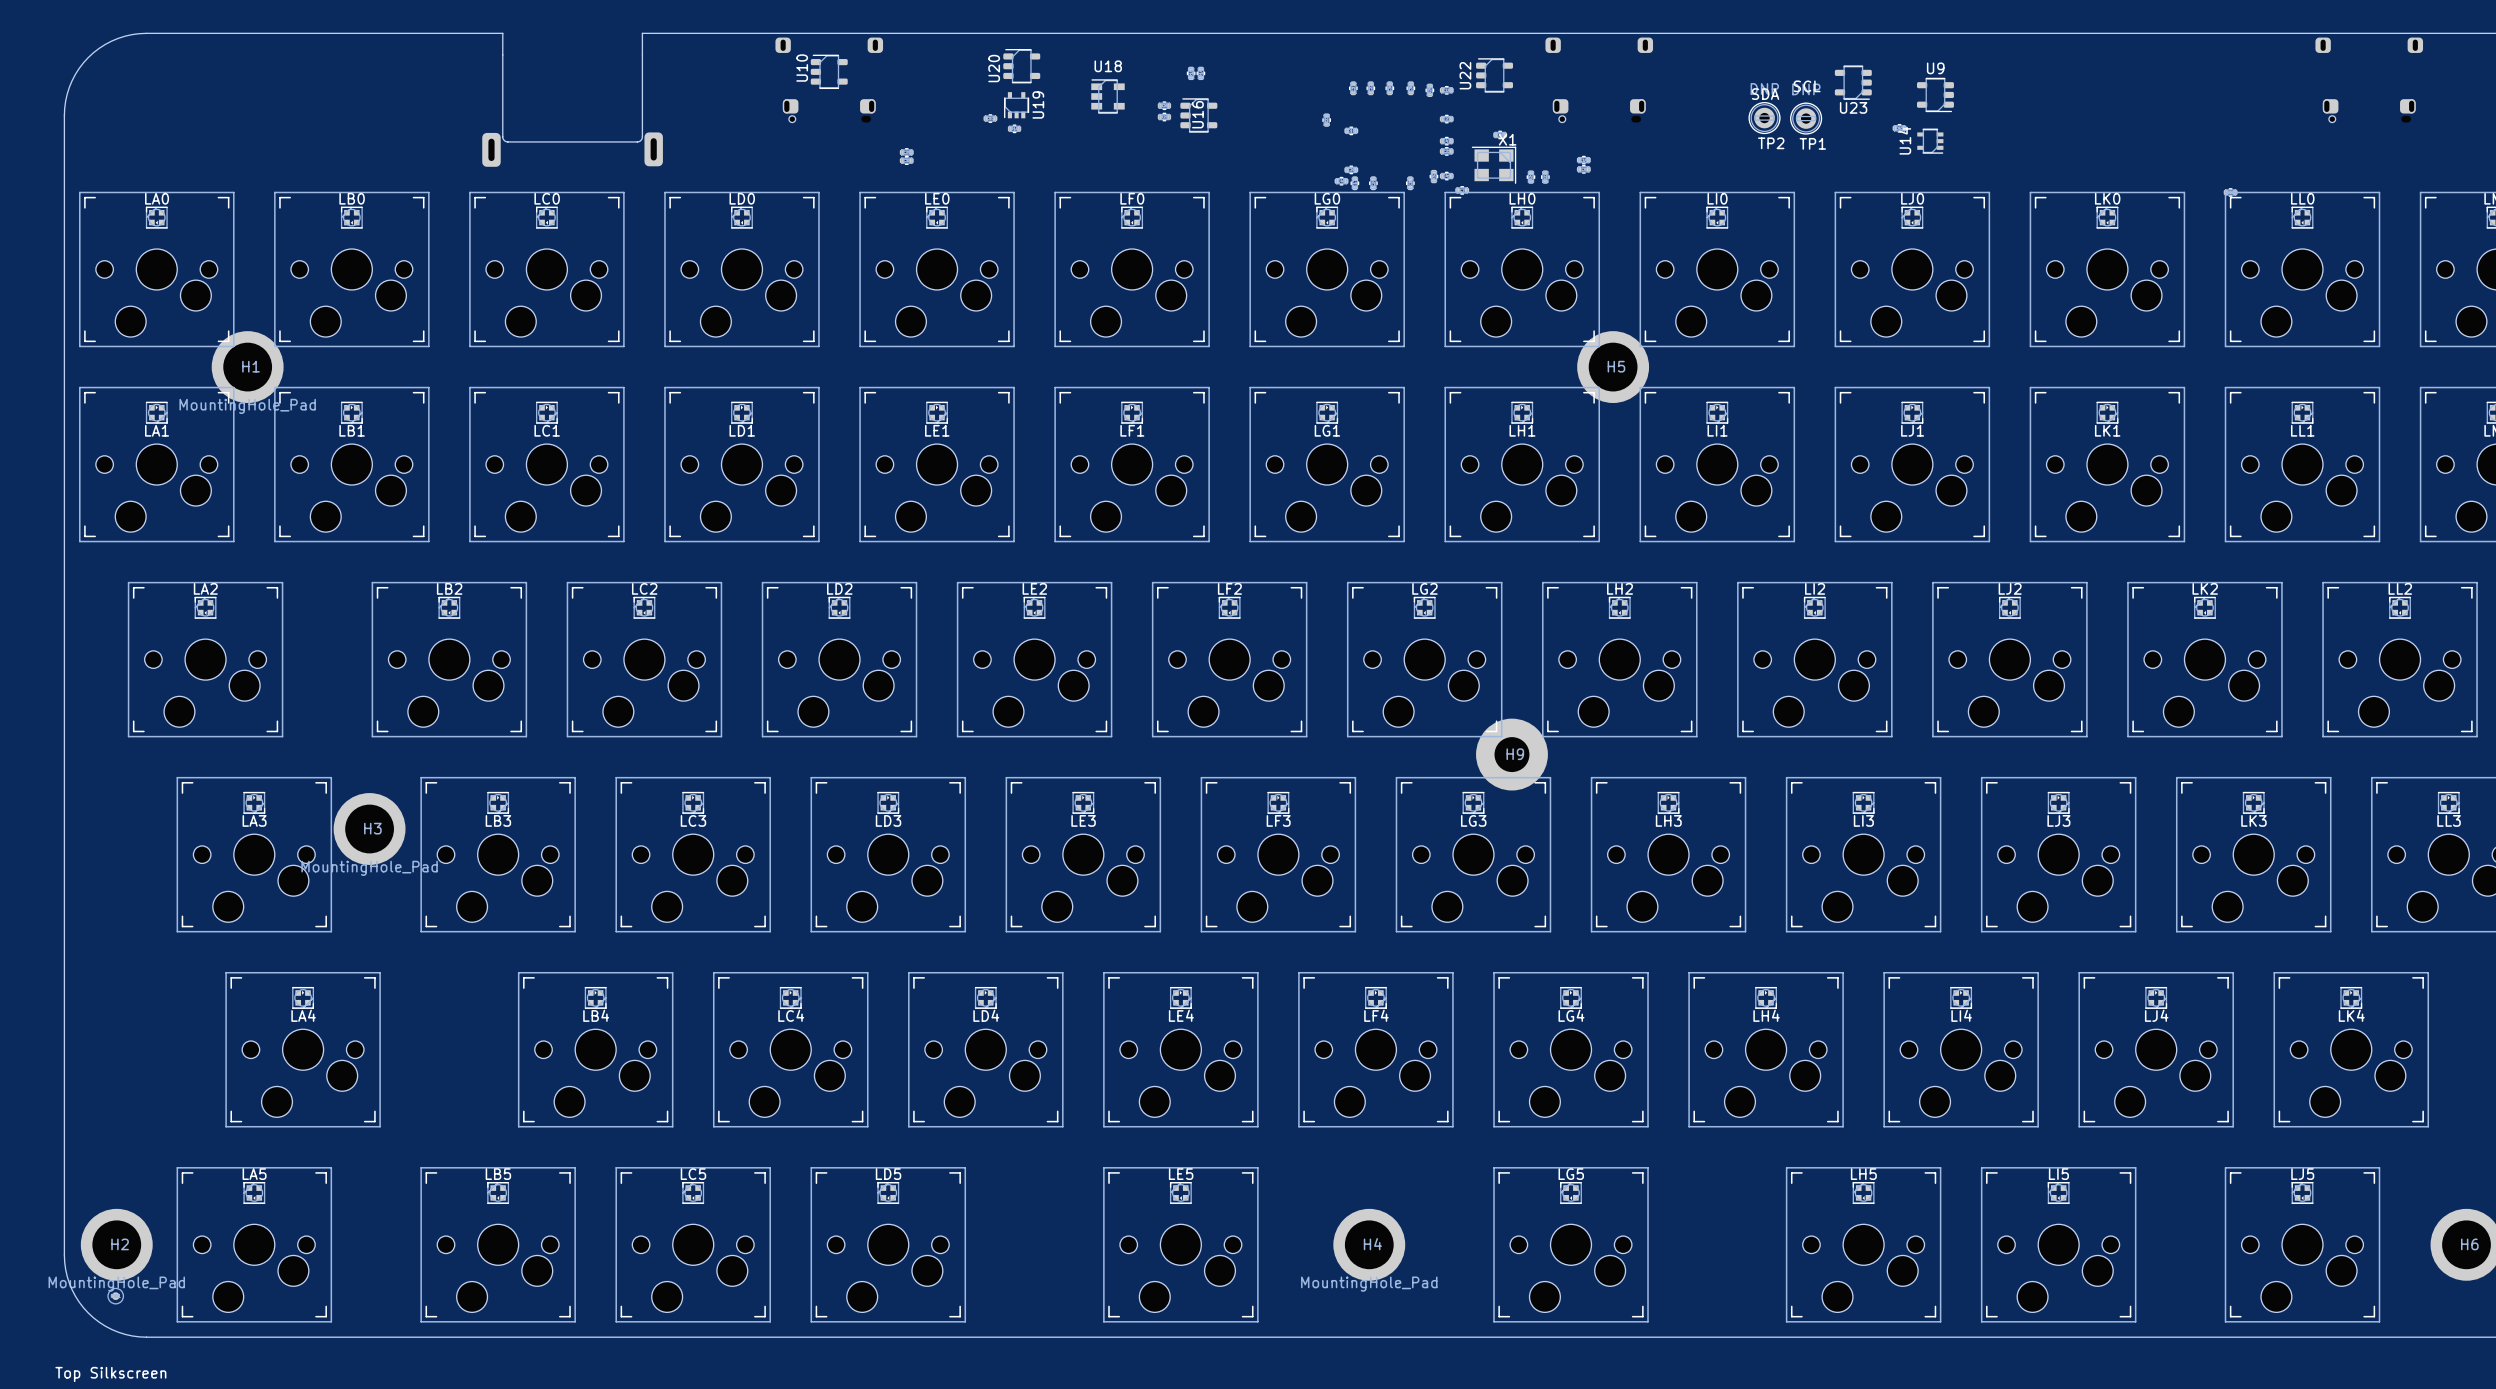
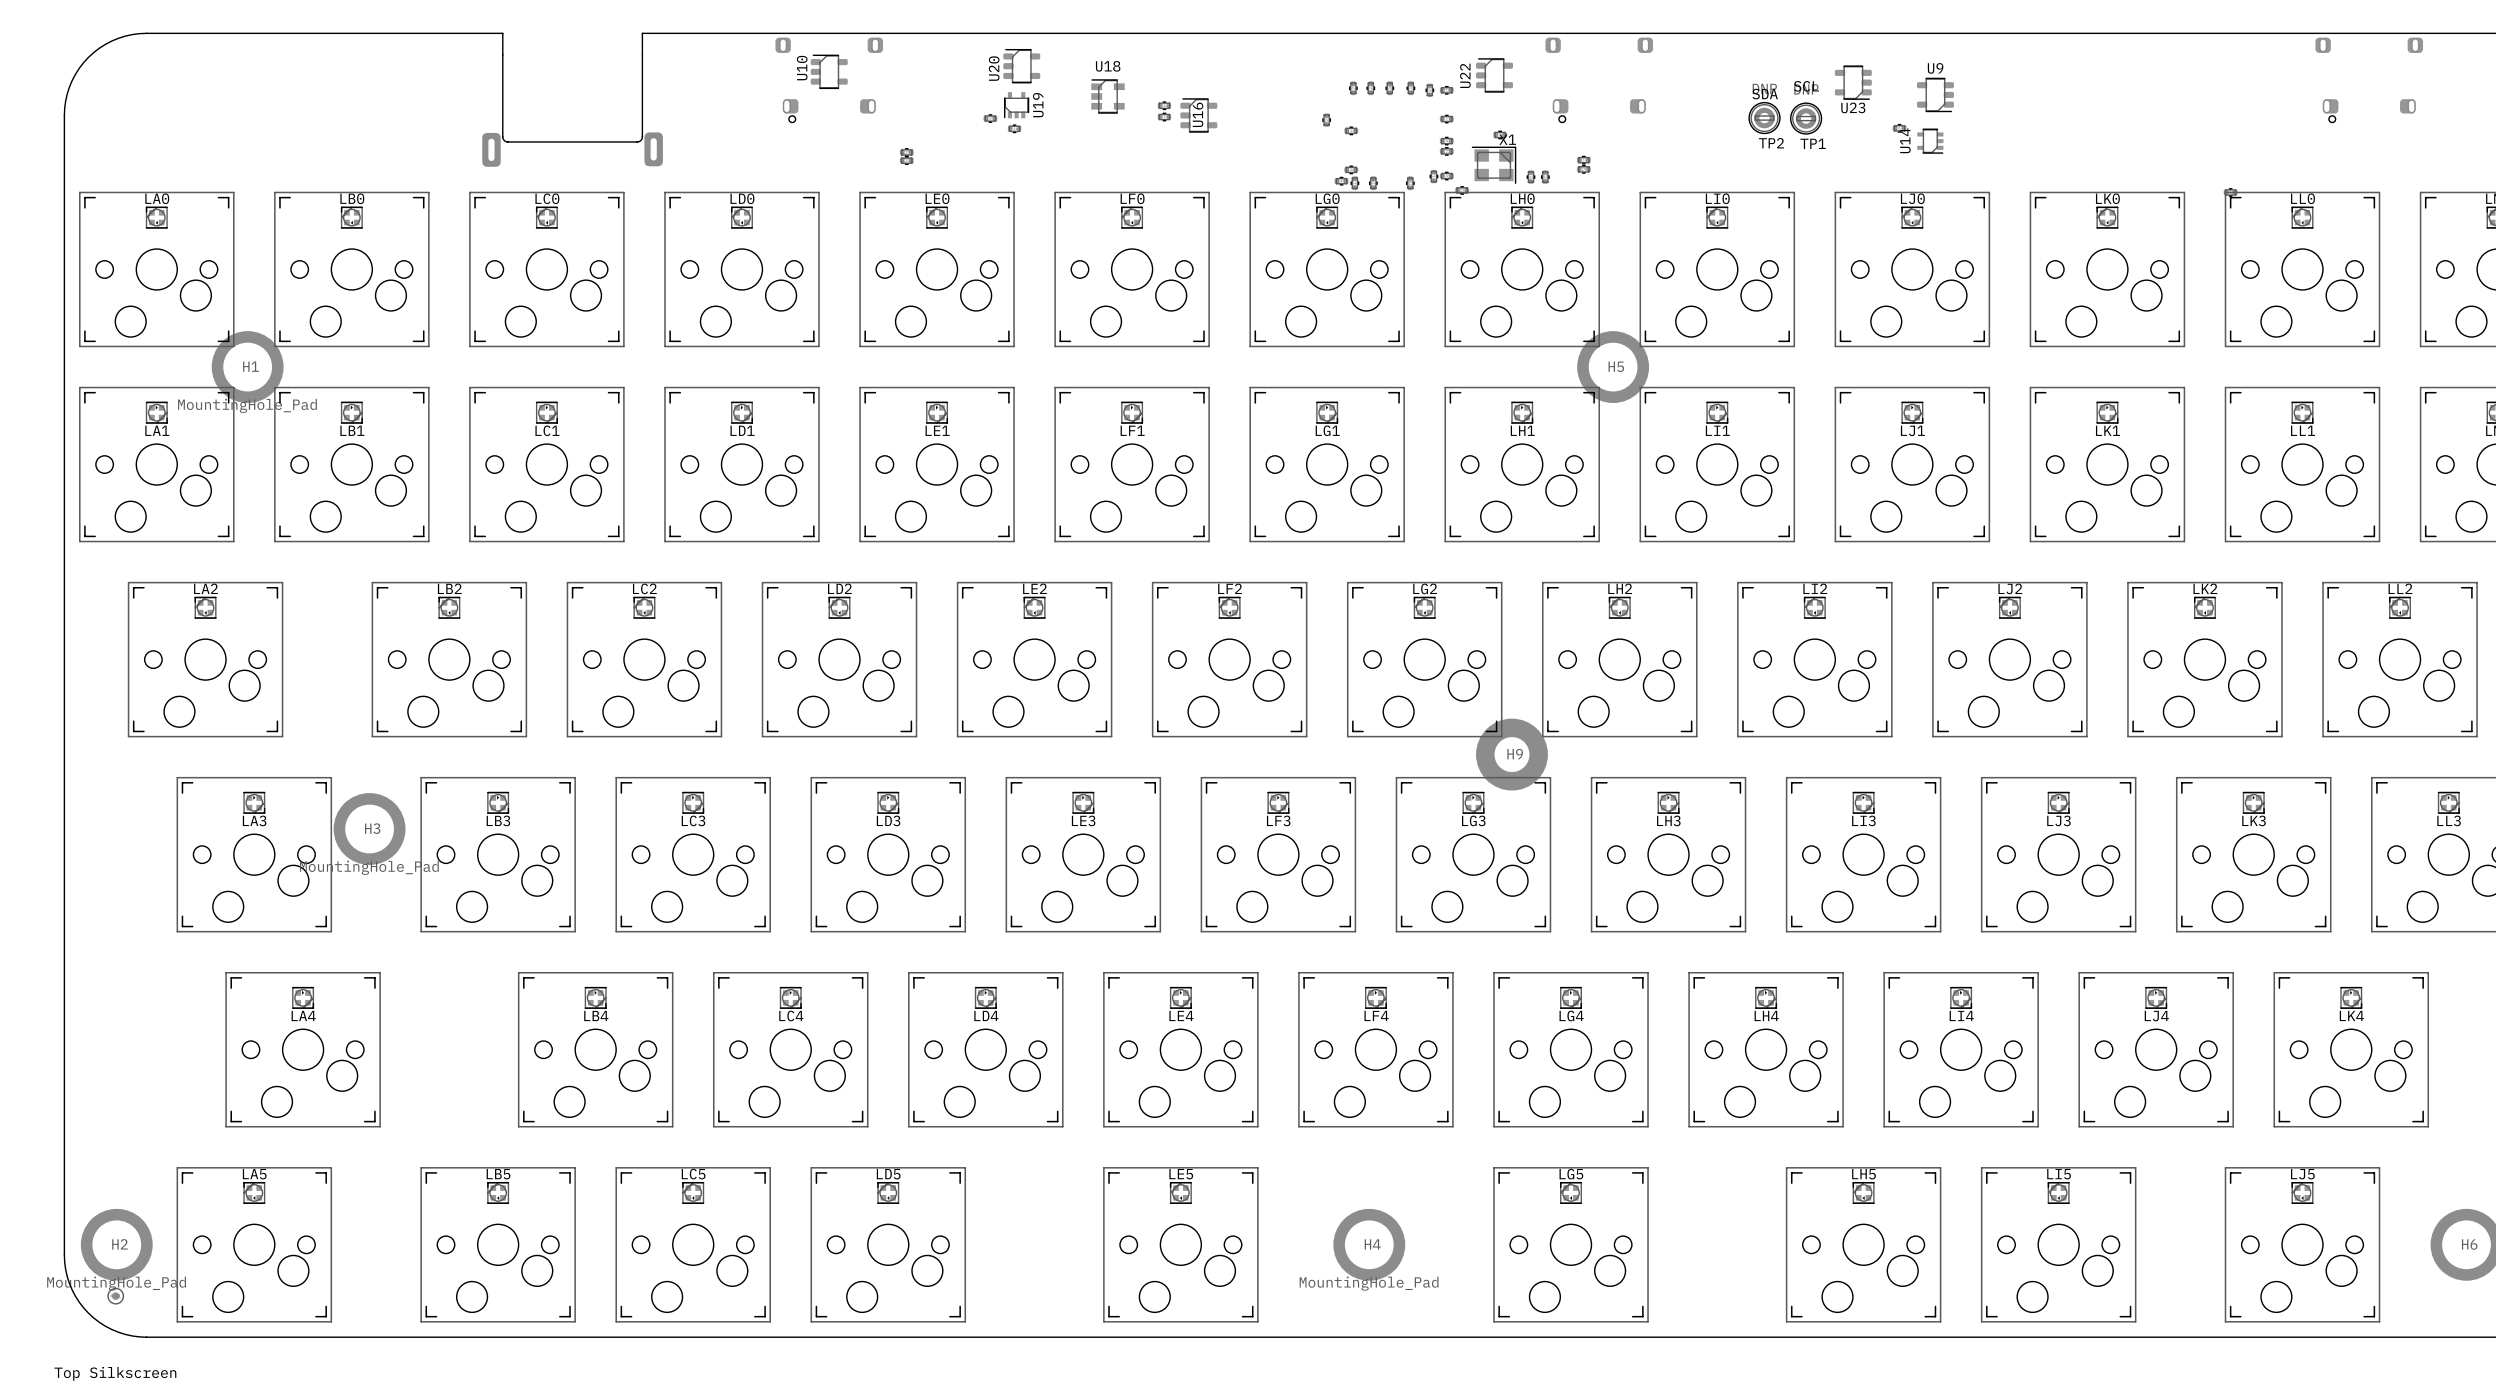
part: (1191, 73) -> none
part: (1200, 73) -> none

